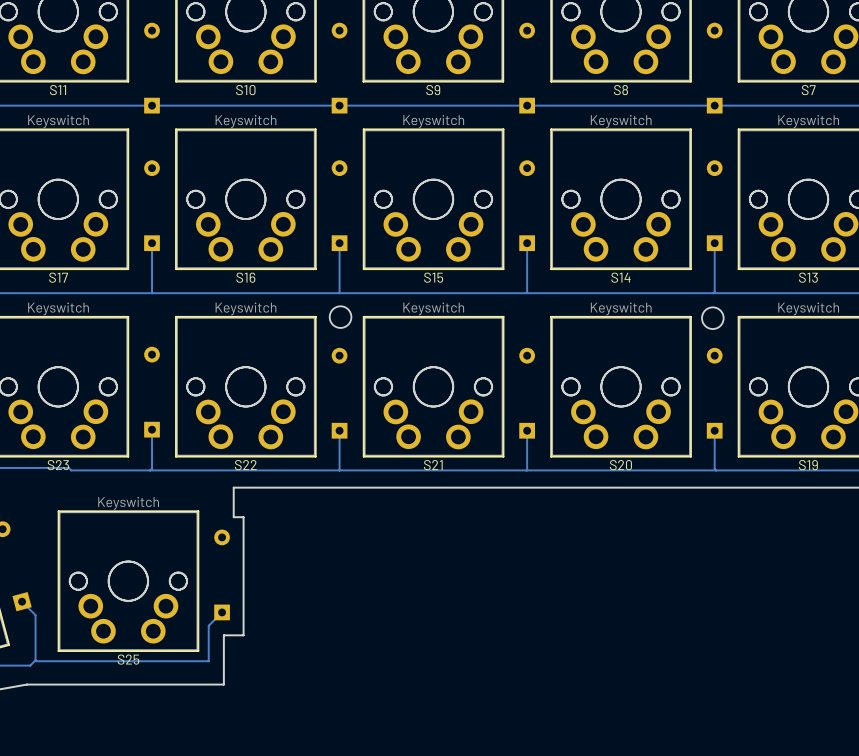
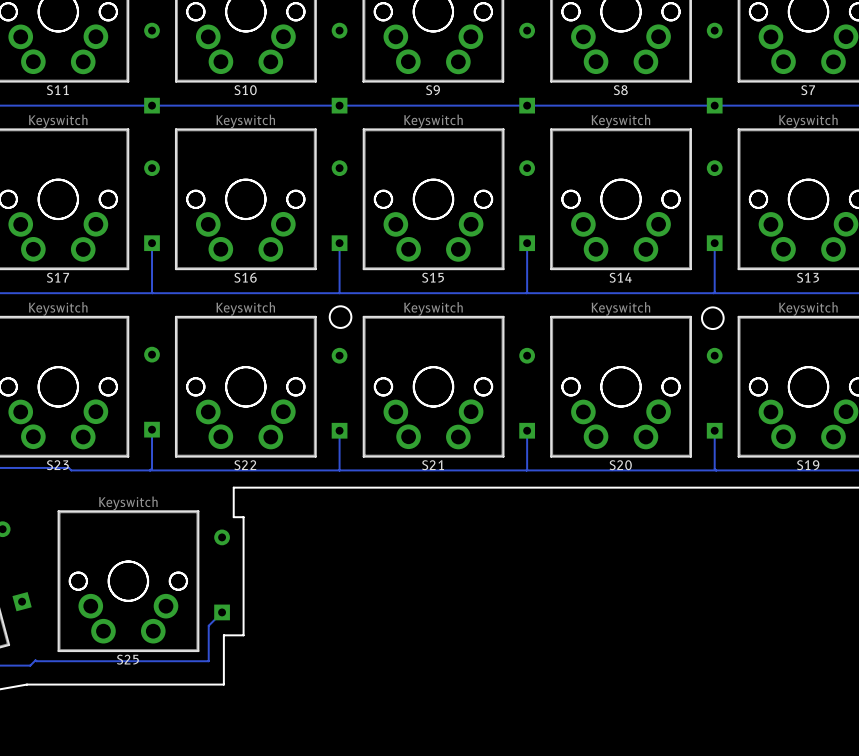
track: (22, 601) (35, 615) (35, 660) -> none

